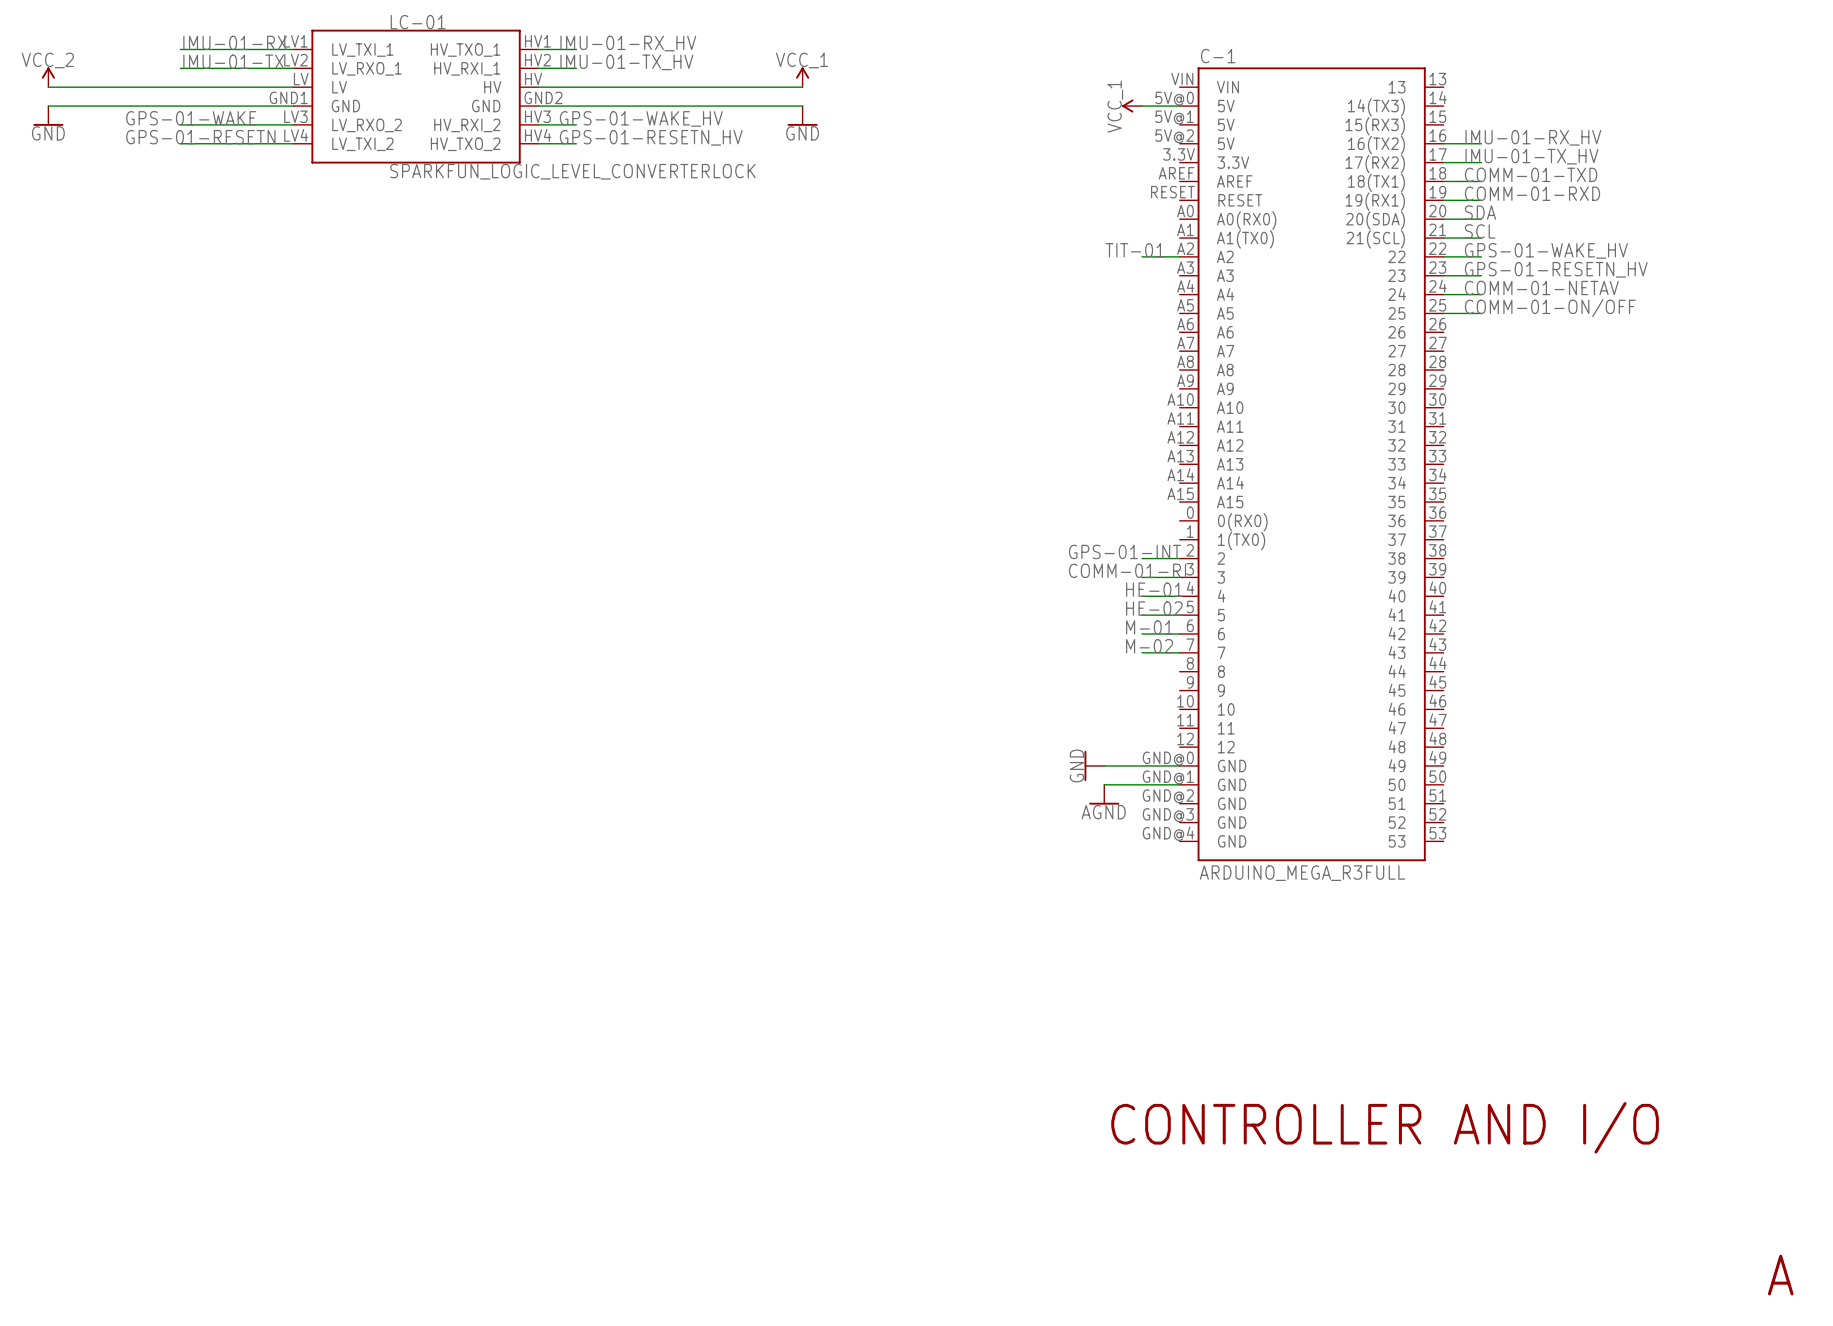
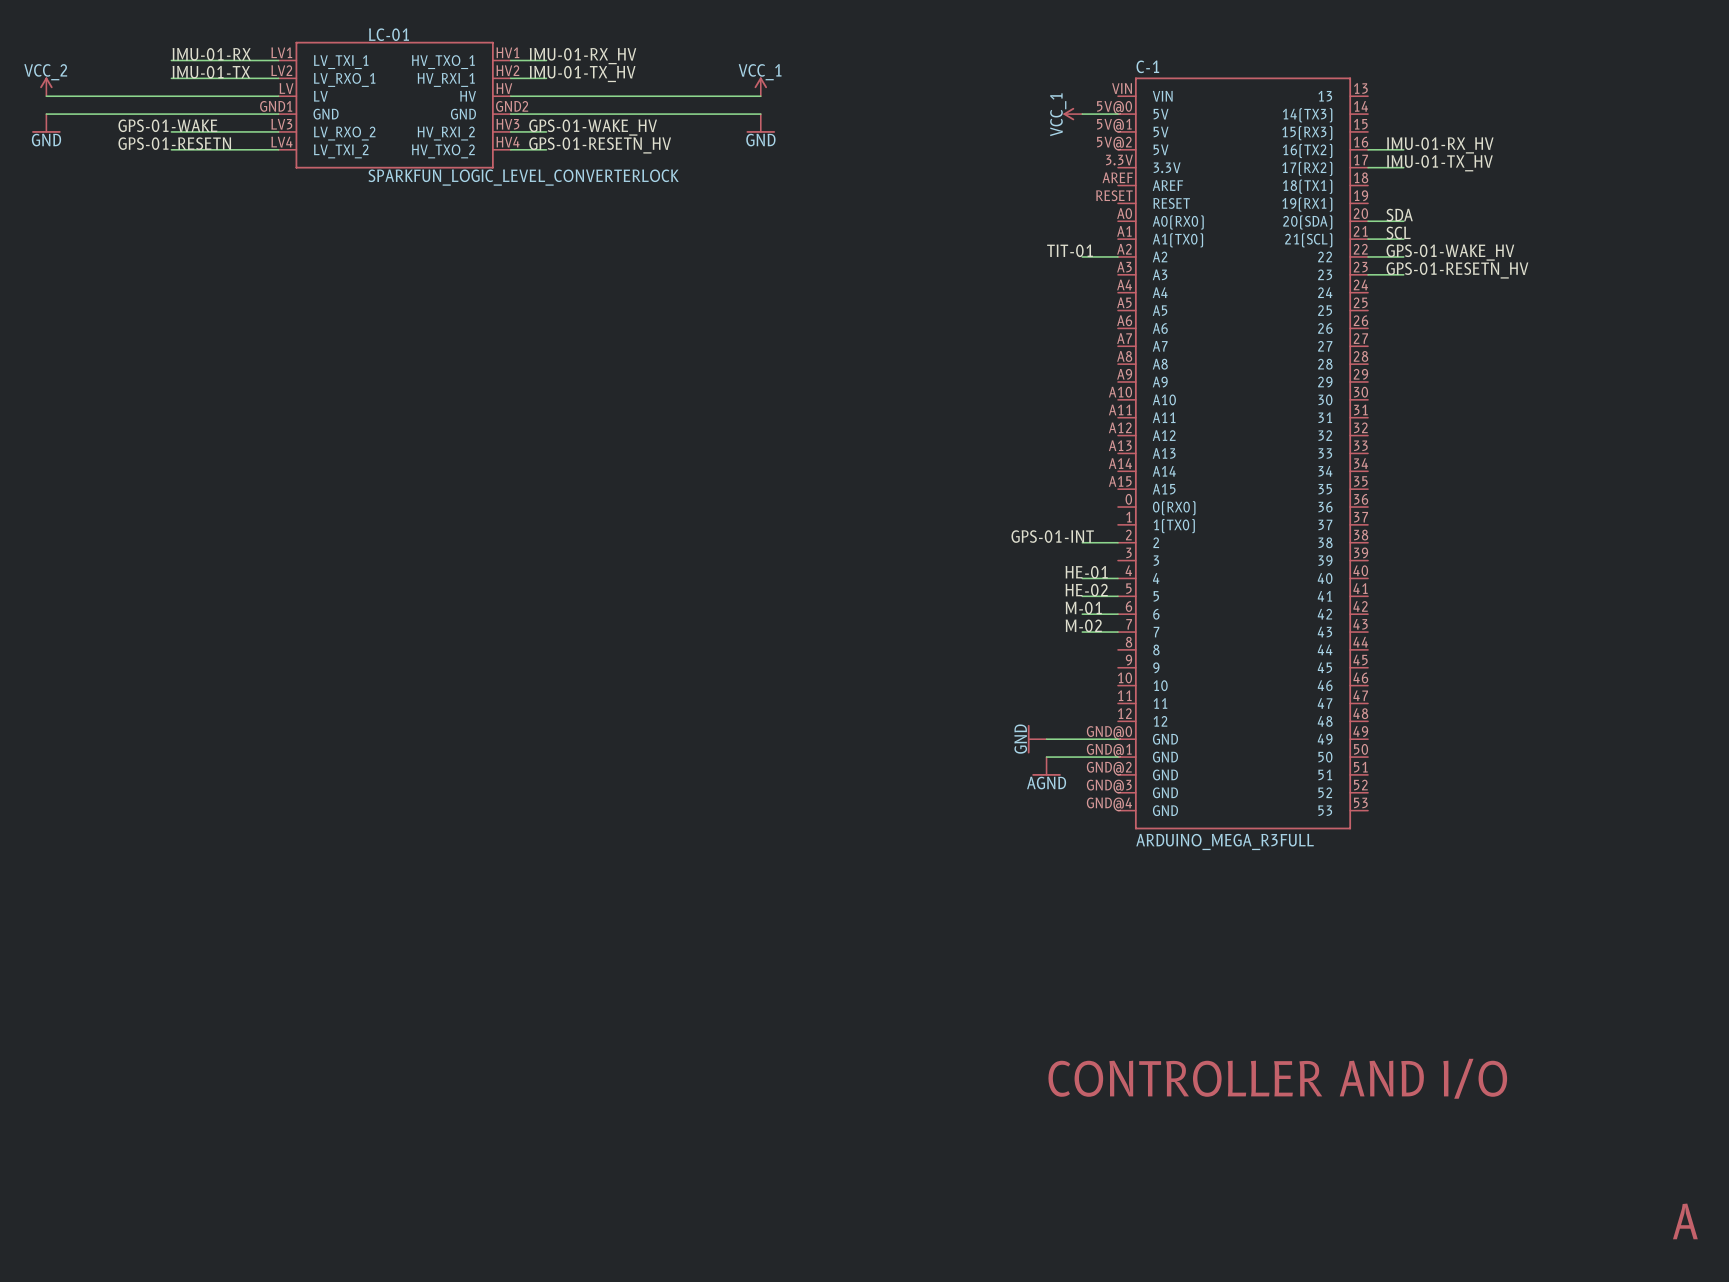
label: COMM-01-TXD (1531, 174) -> none
wire: (1443, 181) (1481, 181) -> none
label: COMM-01-RXD (1532, 193) -> none
wire: (1443, 200) (1481, 200) -> none
label: COMM-01-NETAV (1541, 288) -> none
wire: (1443, 294) (1481, 294) -> none
label: COMM-01-ON/OFF (1550, 308) -> none
wire: (1443, 313) (1481, 313) -> none
label: COMM-01-RI (1127, 570) -> none
wire: (1141, 577) (1179, 577) -> none

